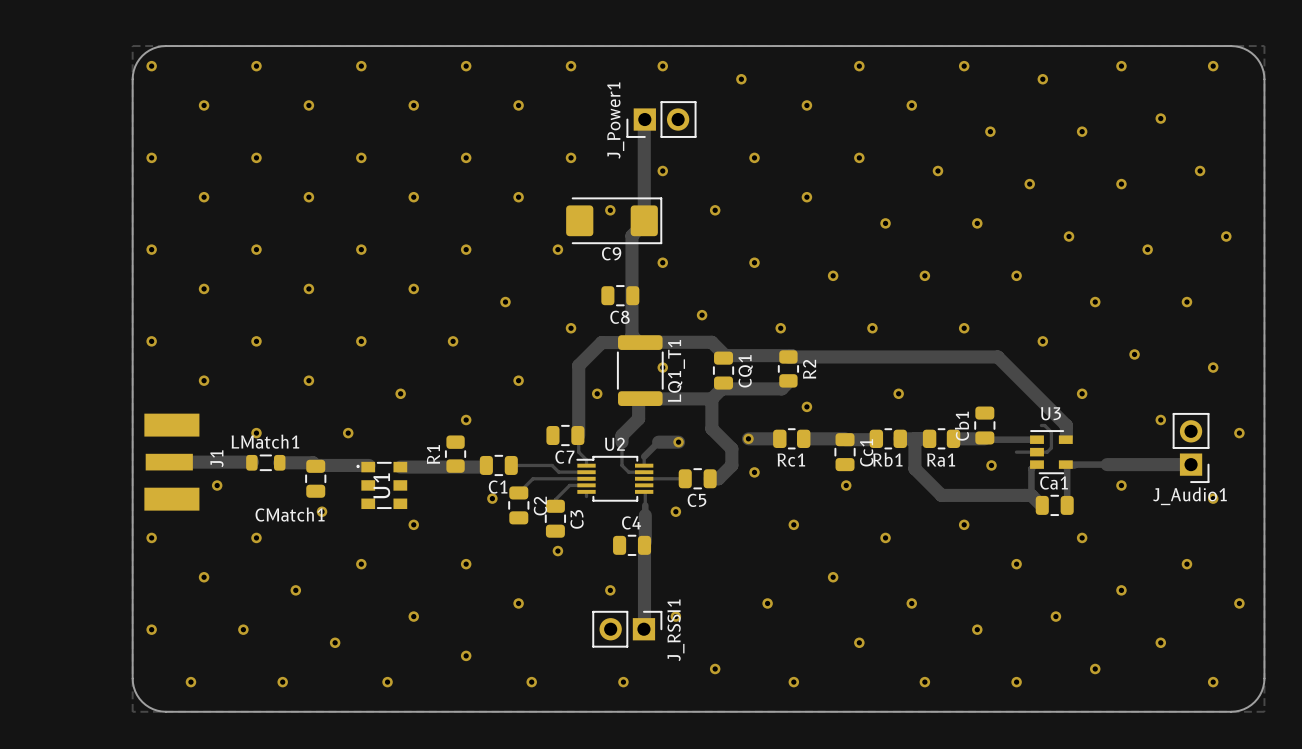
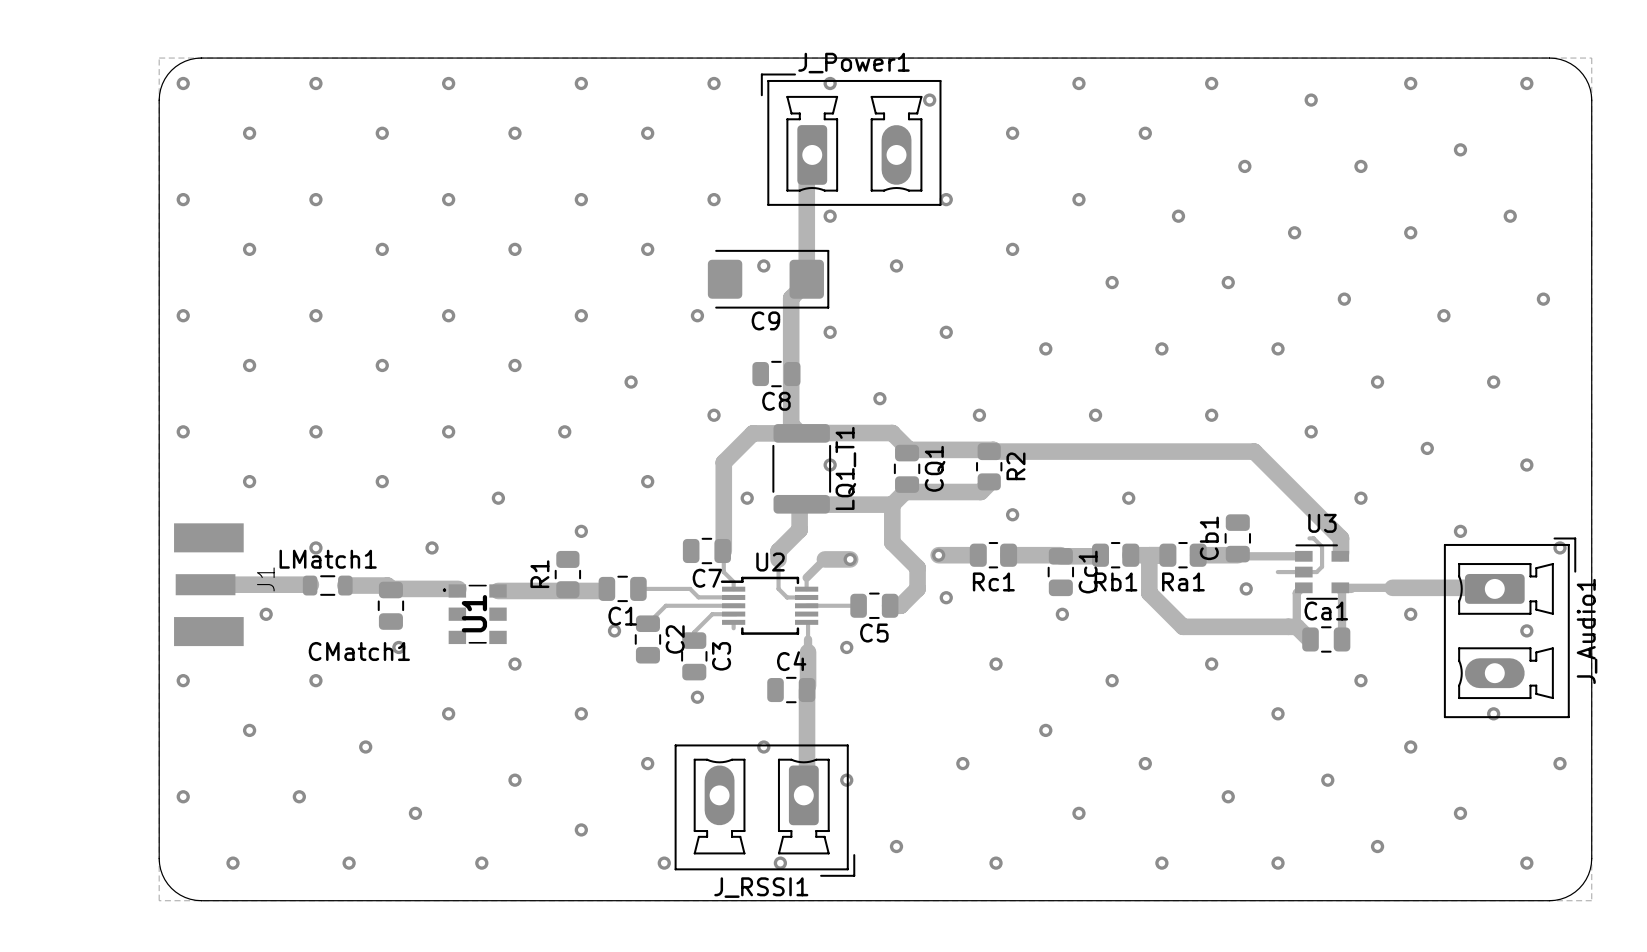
J_Power1 footprint: [626, 101, 697, 138] -> [760, 73, 942, 206]
J_Power1 name position: J_Power1 (615, 120) -> J_Power1 (854, 63)
J_Audio1 footprint: [1172, 413, 1210, 483] -> [1443, 537, 1577, 719]
J_Audio1 name position: J_Audio1 (1189, 496) -> J_Audio1 (1587, 631)
J_RSSI1 footprint: [592, 611, 663, 648] -> [674, 744, 856, 877]
J_RSSI1 name position: J_RSSI1 (675, 630) -> J_RSSI1 (761, 887)

